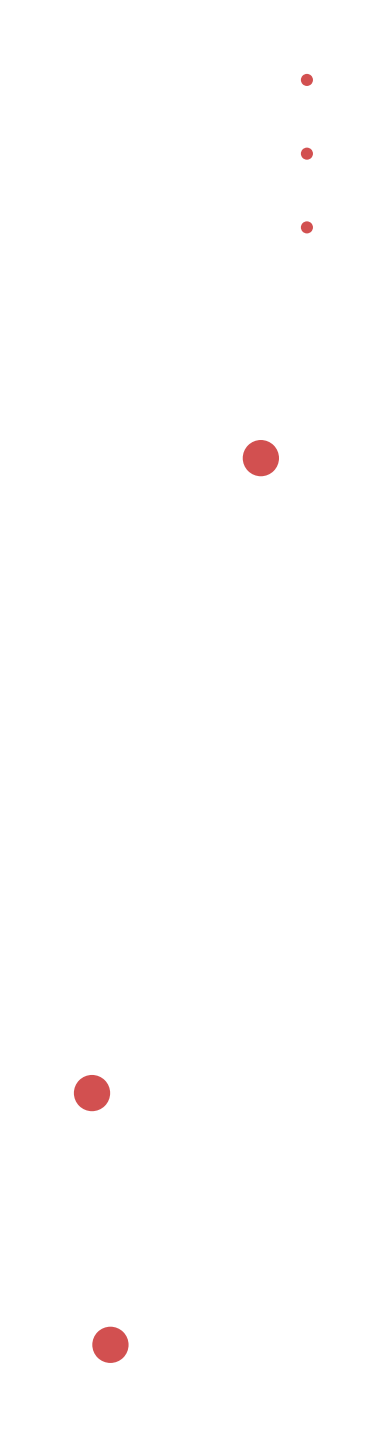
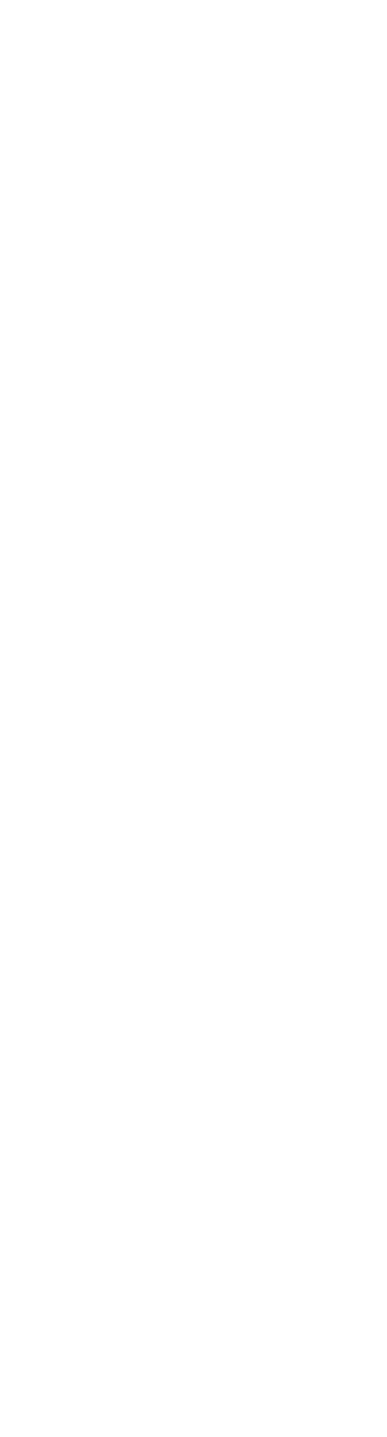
part: (306, 79) -> none
part: (306, 153) -> none
part: (306, 227) -> none
part: (260, 458) -> none
part: (92, 1093) -> none
part: (110, 1344) -> none

